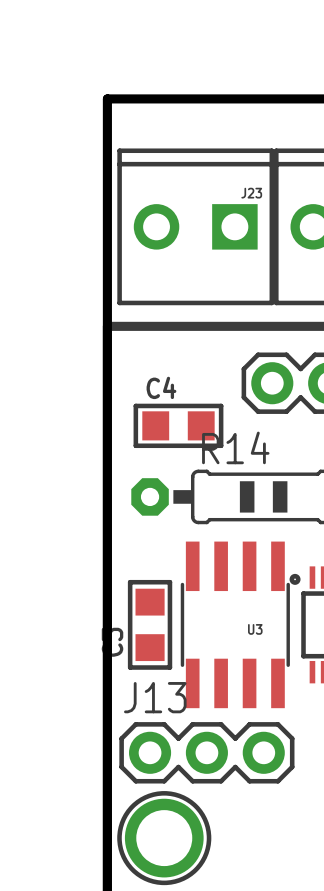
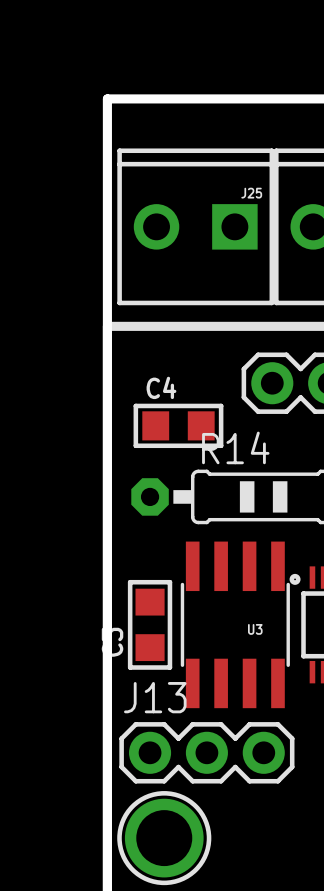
J23 name: J23 (251, 193) -> J25 (251, 193)

